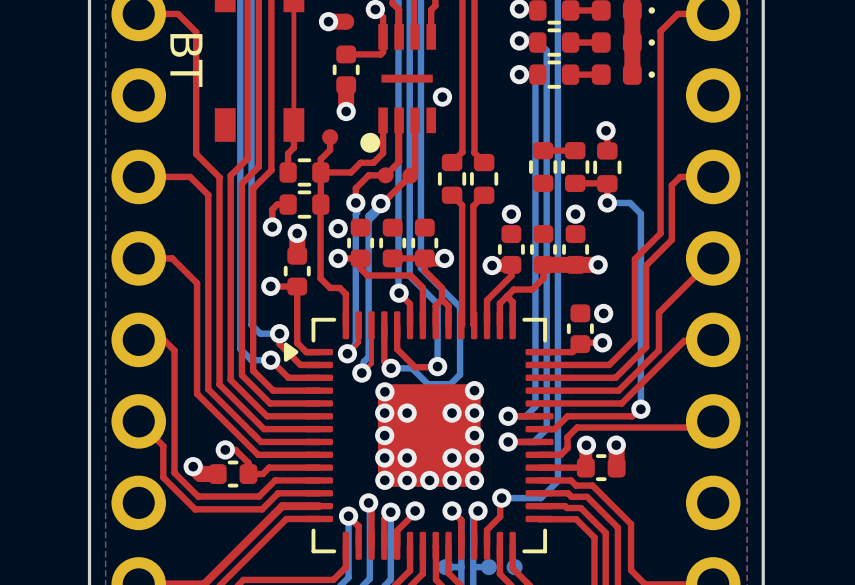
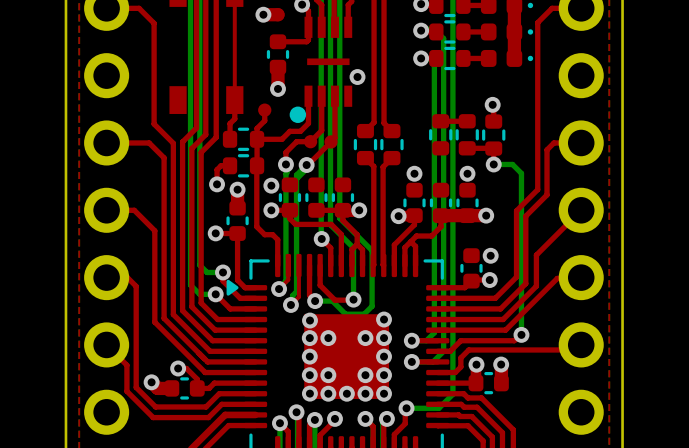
text: BT (186, 60) -> none

